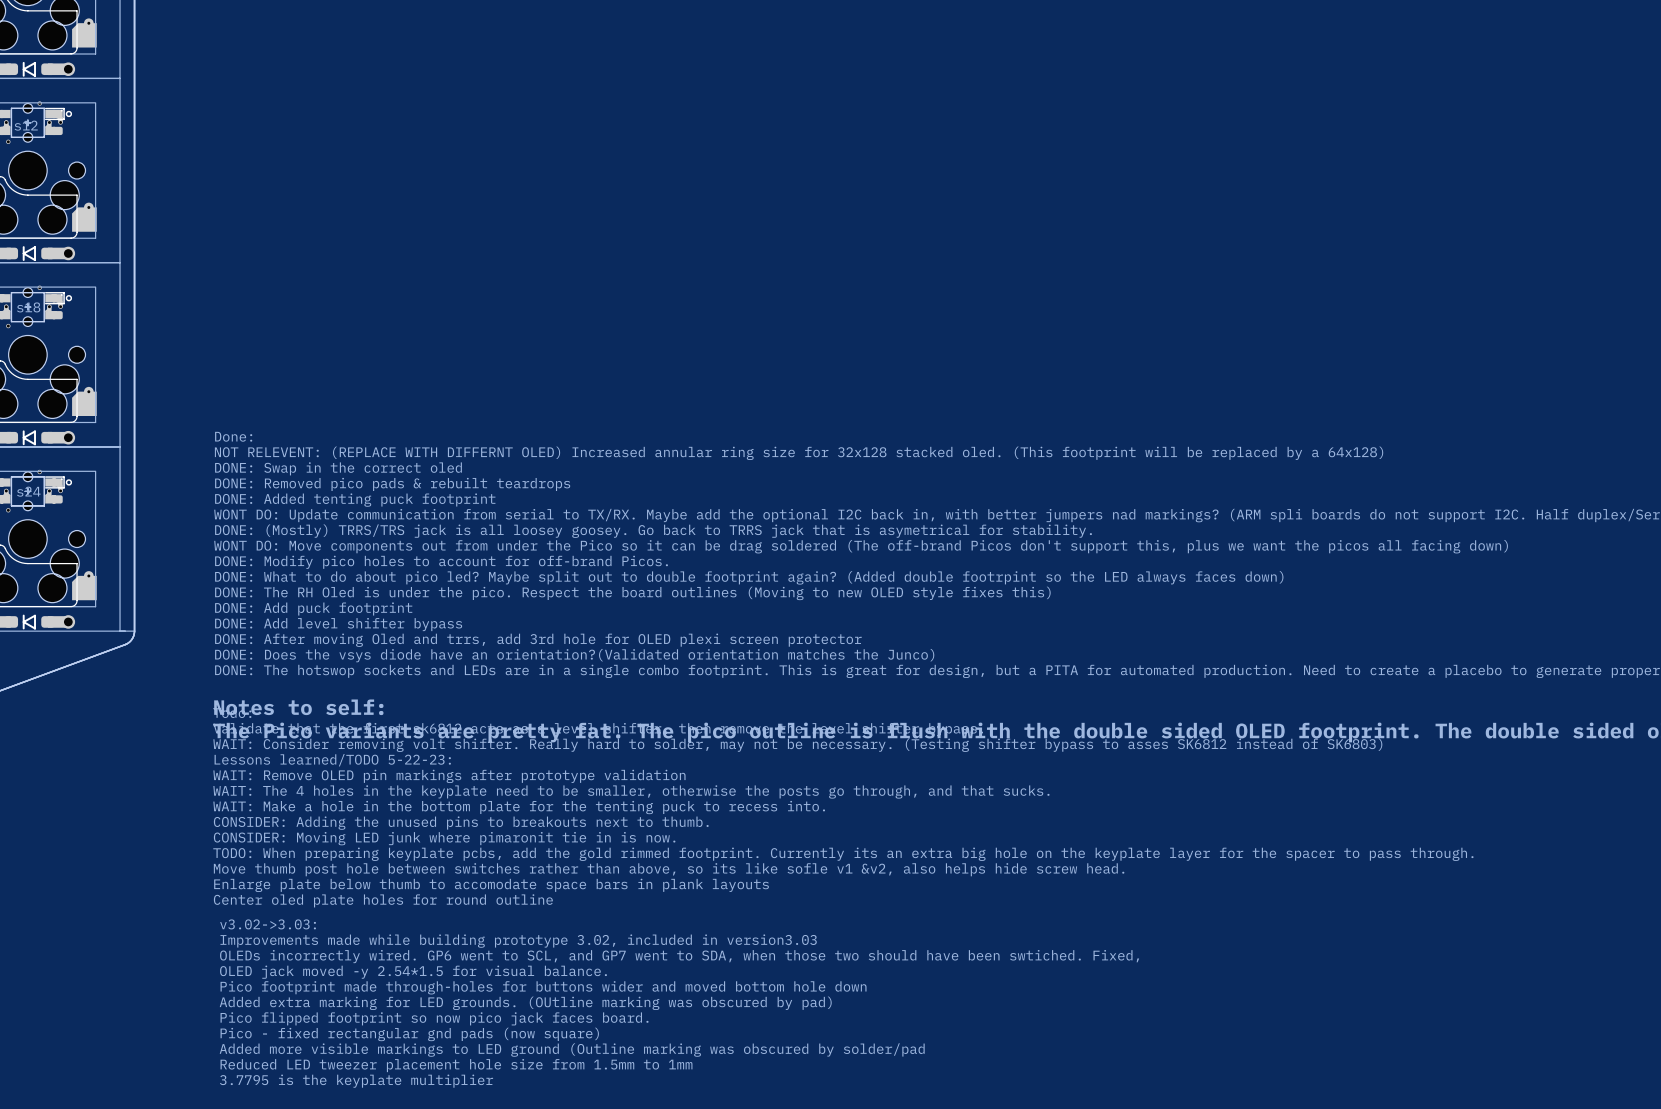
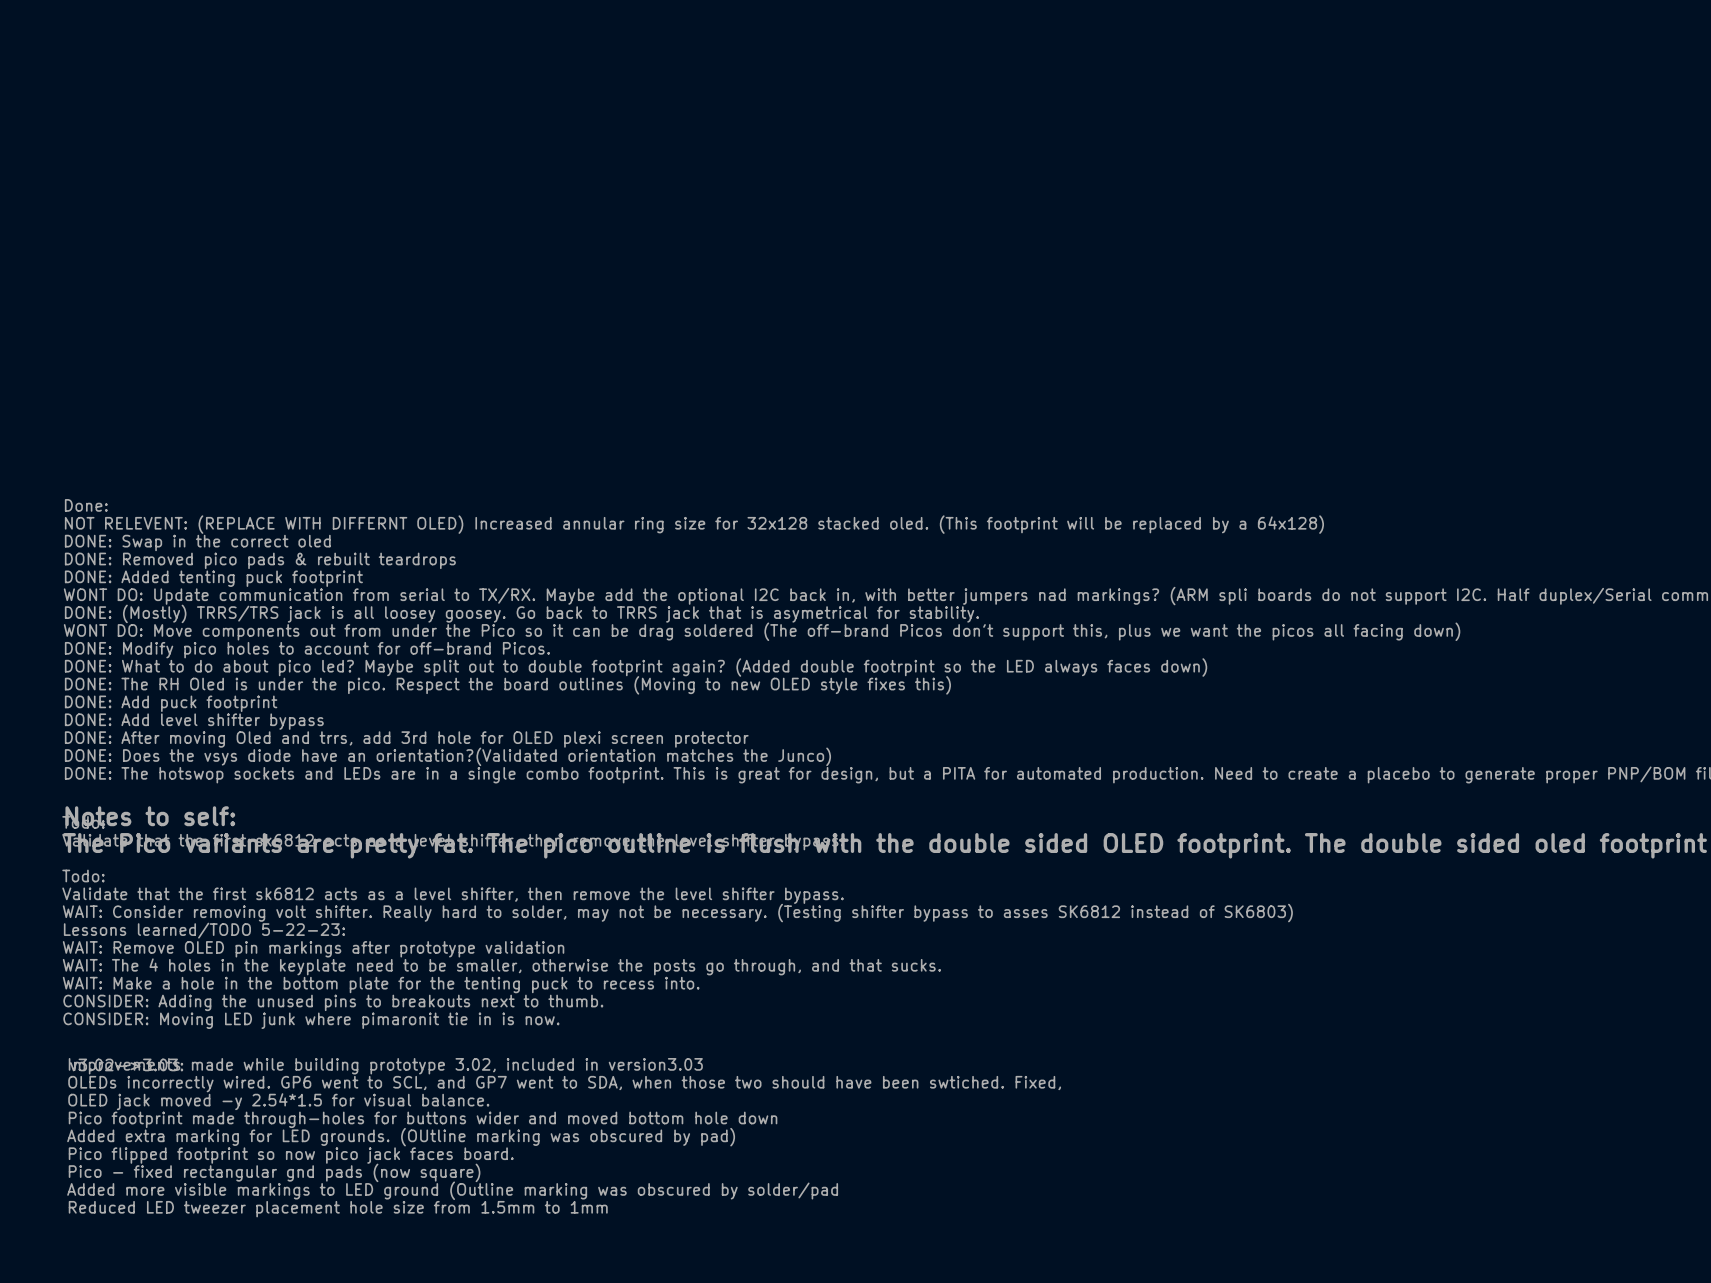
text: WAIT: Consider removing volt shifter. Really hard to solder, may not be necessary. (Testing shifter bypass to asses SK6812 instead of SK6803) (797, 745) -> none
text: Lessons learned/TODO 5-22-23: (332, 760) -> Todo: (83, 875)
text: WAIT: Remove OLED pin markings after prototype validation (449, 776) -> Validate that the first sk6812 acts as a level shifter, then remove the level shifter bypass. (453, 895)
text: WAIT: The 4 holes in the keyplate need to be smaller, otherwise the posts go through, and that sucks. (631, 791) -> WAIT: Consider removing volt shifter. Really hard to solder, may not be necessary. (Testing shifter bypass to asses SK6812 instead of SK6803) (677, 913)
text: WAIT: Make a hole in the bottom plate for the tenting puck to recess into. (519, 807) -> Lessons learned/TODO 5-22-23: (204, 930)
text: CONSIDER: Adding the unused pins to breakouts next to thumb. (461, 823) -> WAIT: Remove OLED pin markings after prototype validation (313, 949)
text: CONSIDER: Moving LED junk where pimaronit tie in is now. (444, 838) -> WAIT: The 4 holes in the keyplate need to be smaller, otherwise the posts go through, and that sucks. (501, 966)
text: TODO: When preparing keyplate pcbs, add the gold rimmed footprint. Currently its an extra big hole on the keyplate layer for the spacer to pass through. (843, 854) -> WAIT: Make a hole in the bottom plate for the tenting puck to recess into. (381, 985)
text: Move thumb post hole between switches rather than above, so its like sofle v1 &v2, also helps hide screw head. (669, 869) -> CONSIDER: Adding the unused pins to breakouts next to thumb. (333, 1002)
text: Enlarge plate below thumb to accomodate space bars in plank layouts (491, 885) -> CONSIDER: Moving LED junk where pimaronit tie in is now. (311, 1020)
text: Center oled plate holes for round outline (383, 900) -> none
text position: Improvements made while building prototype 3.02, included in version3.03 (518, 941) -> Improvements made while building prototype 3.02, included in version3.03 (385, 1066)
text position: OLEDs incorrectly wired. GP6 went to SCL, and GP7 went to SDA, when those two should have been swtiched. Fixed, (679, 956) -> OLEDs incorrectly wired. GP6 went to SCL, and GP7 went to SDA, when those two should have been swtiched. Fixed, (564, 1084)
text position: OLED jack moved -y 2.54*1.5 for visual balance. (413, 972) -> OLED jack moved -y 2.54*1.5 for visual balance. (278, 1101)
text position: Pico footprint made through-holes for buttons wider and moved bottom hole down (543, 987) -> Pico footprint made through-holes for buttons wider and moved bottom hole down (423, 1119)
text position: Added extra marking for LED grounds. (OUtline marking was obscured by pad) (525, 1003) -> Added extra marking for LED grounds. (OUtline marking was obscured by pad) (401, 1137)
text position: Pico flipped footprint so now pico jack faces board. (434, 1018) -> Pico flipped footprint so now pico jack faces board. (291, 1155)
text position: Pico - fixed rectangular gnd pads (now square) (409, 1034) -> Pico - fixed rectangular gnd pads (now square) (274, 1172)
text position: Added more visible markings to LED ground (Outline marking was obscured by solder/pad (572, 1050) -> Added more visible markings to LED ground (Outline marking was obscured by solder/pad (452, 1190)
text position: Reduced LED tweezer placement hole size from 1.5mm to 1mm (456, 1065) -> Reduced LED tweezer placement hole size from 1.5mm to 1mm (338, 1209)
text: 3.7795 is the keyplate multiplier (356, 1081) -> none

